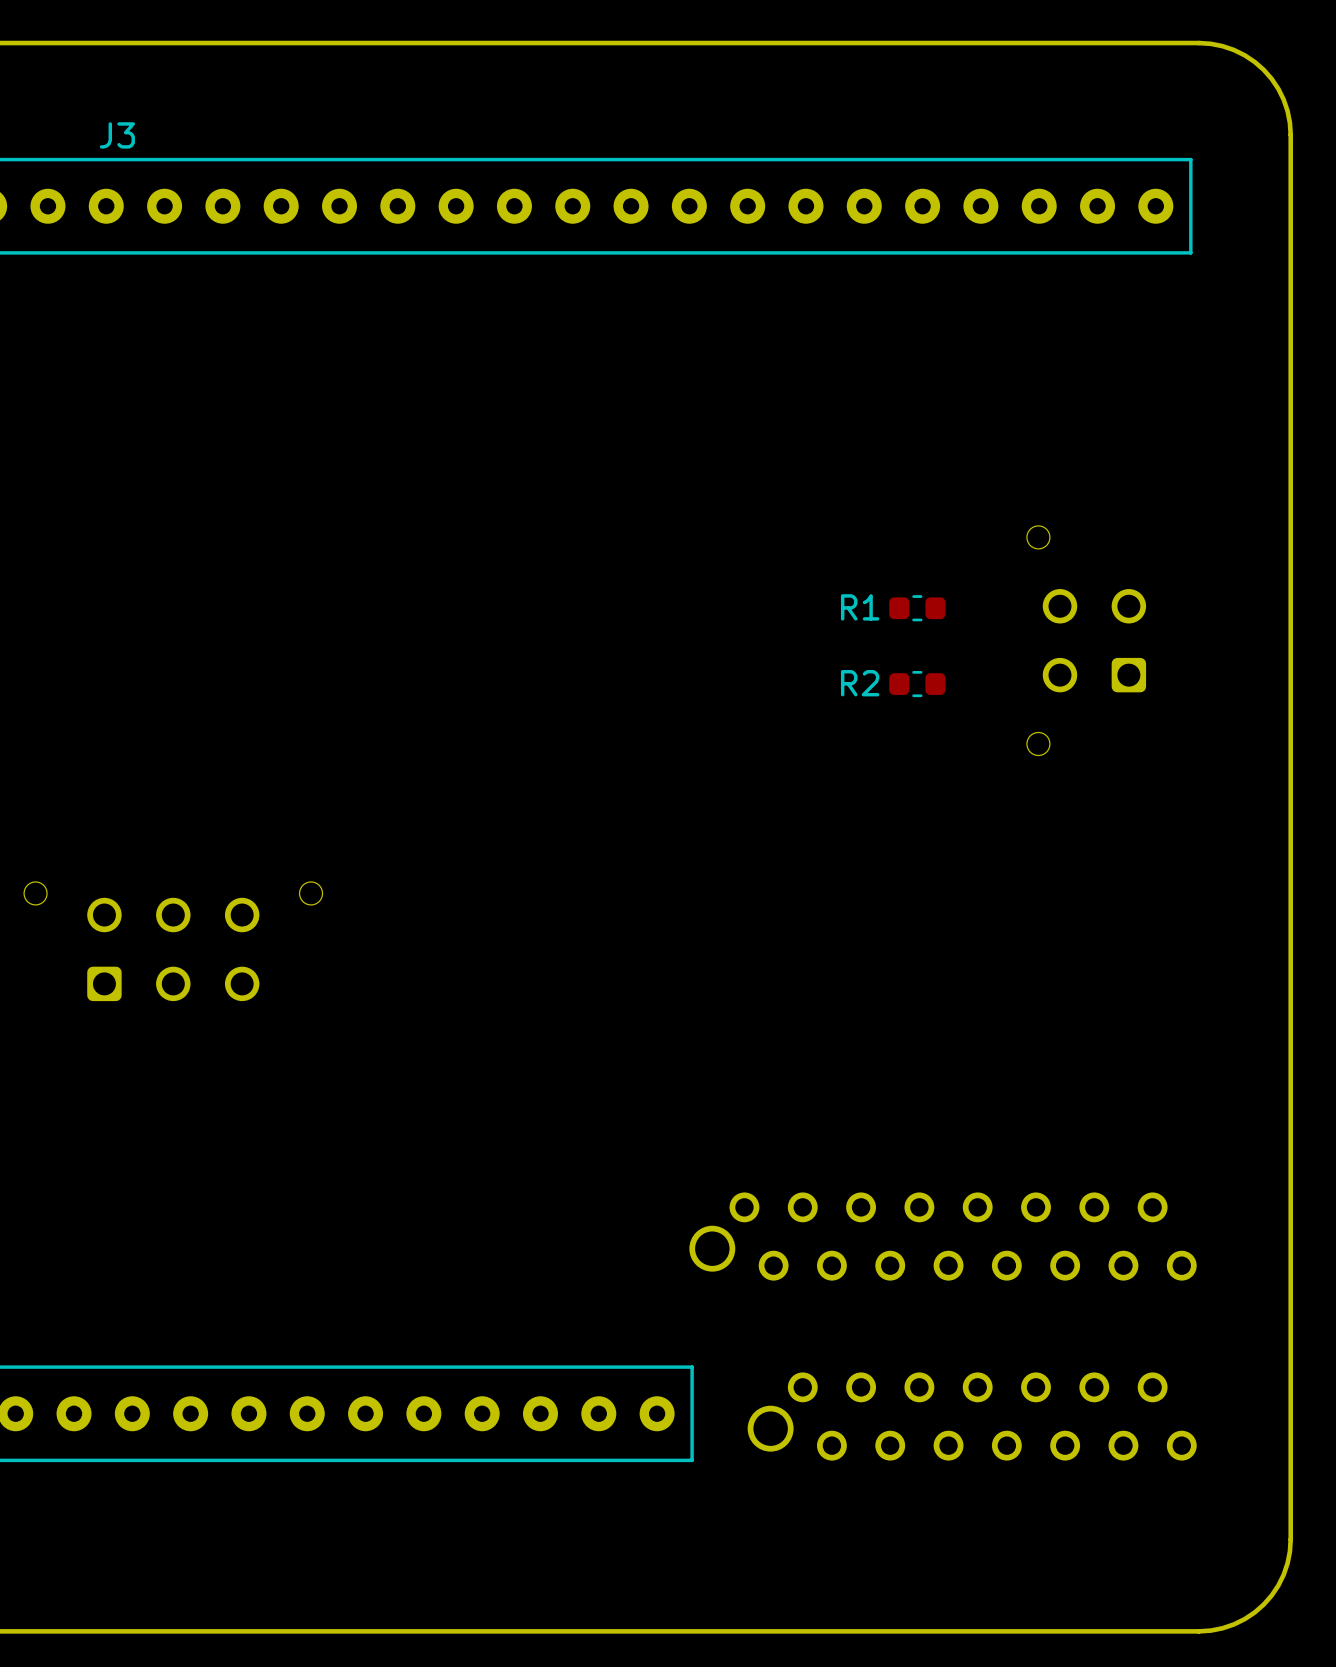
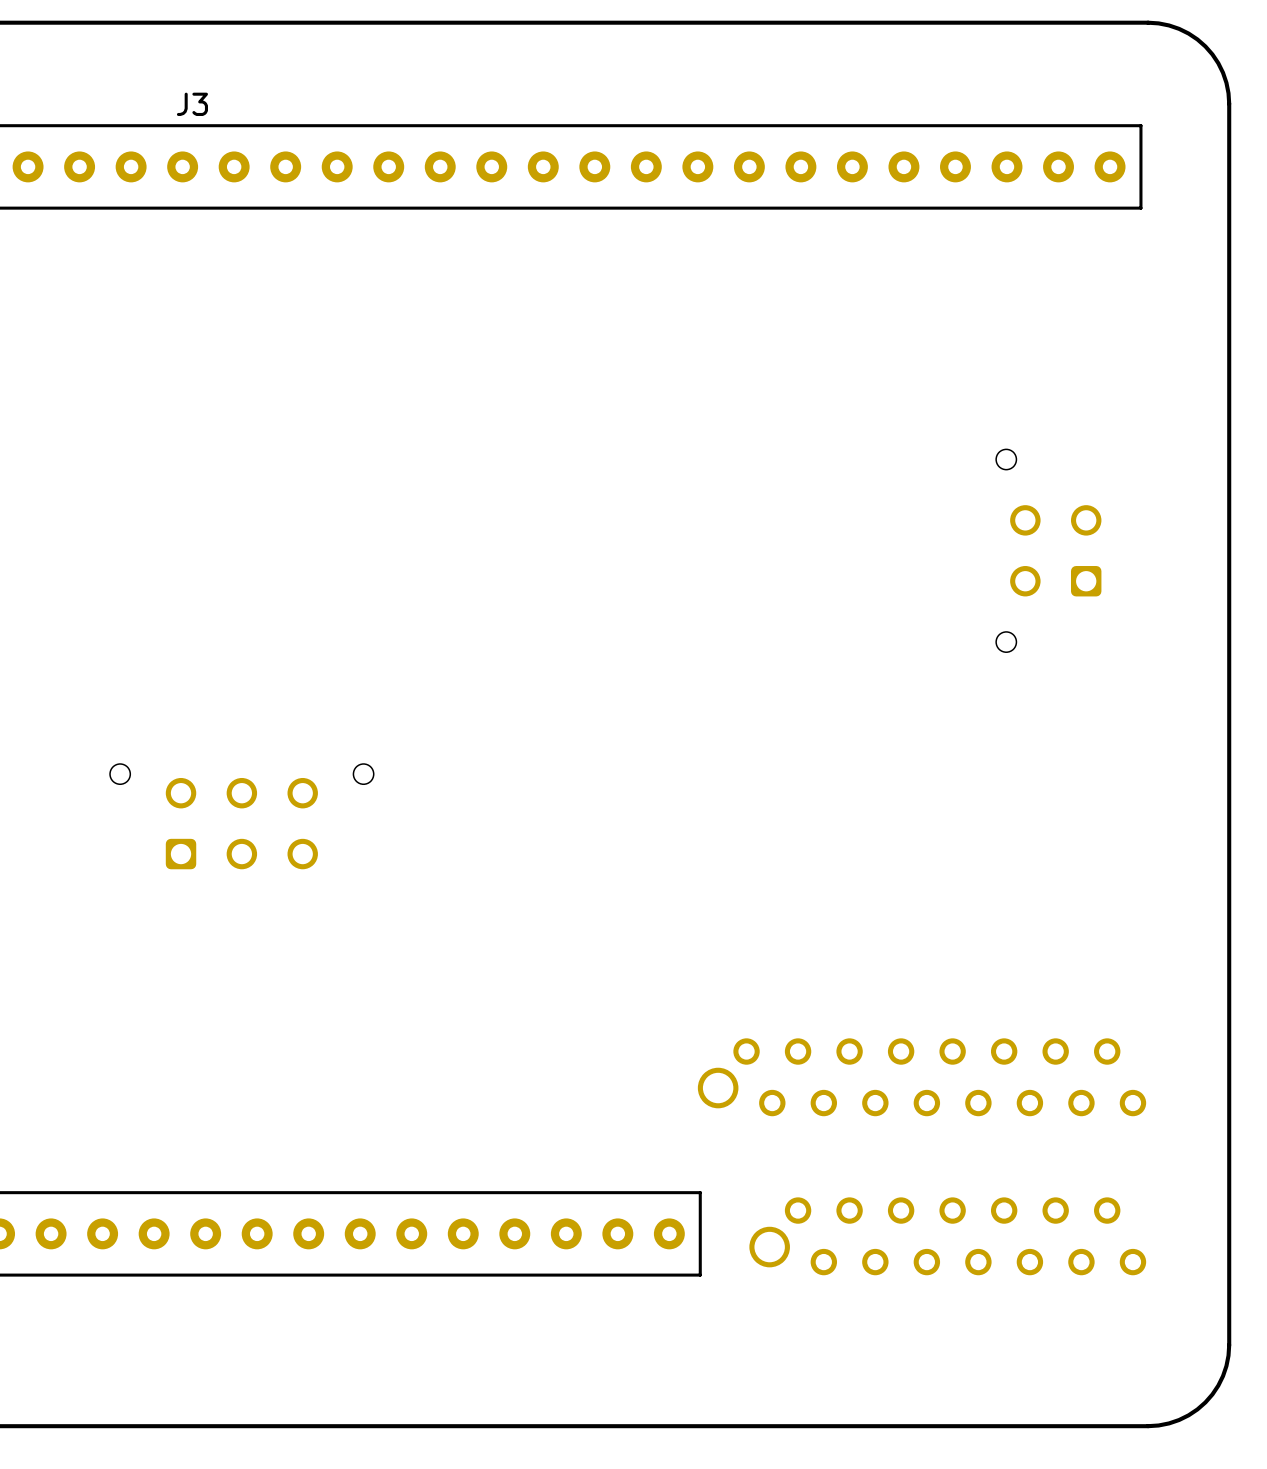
R1: (917, 608) -> none
R2: (917, 684) -> none

